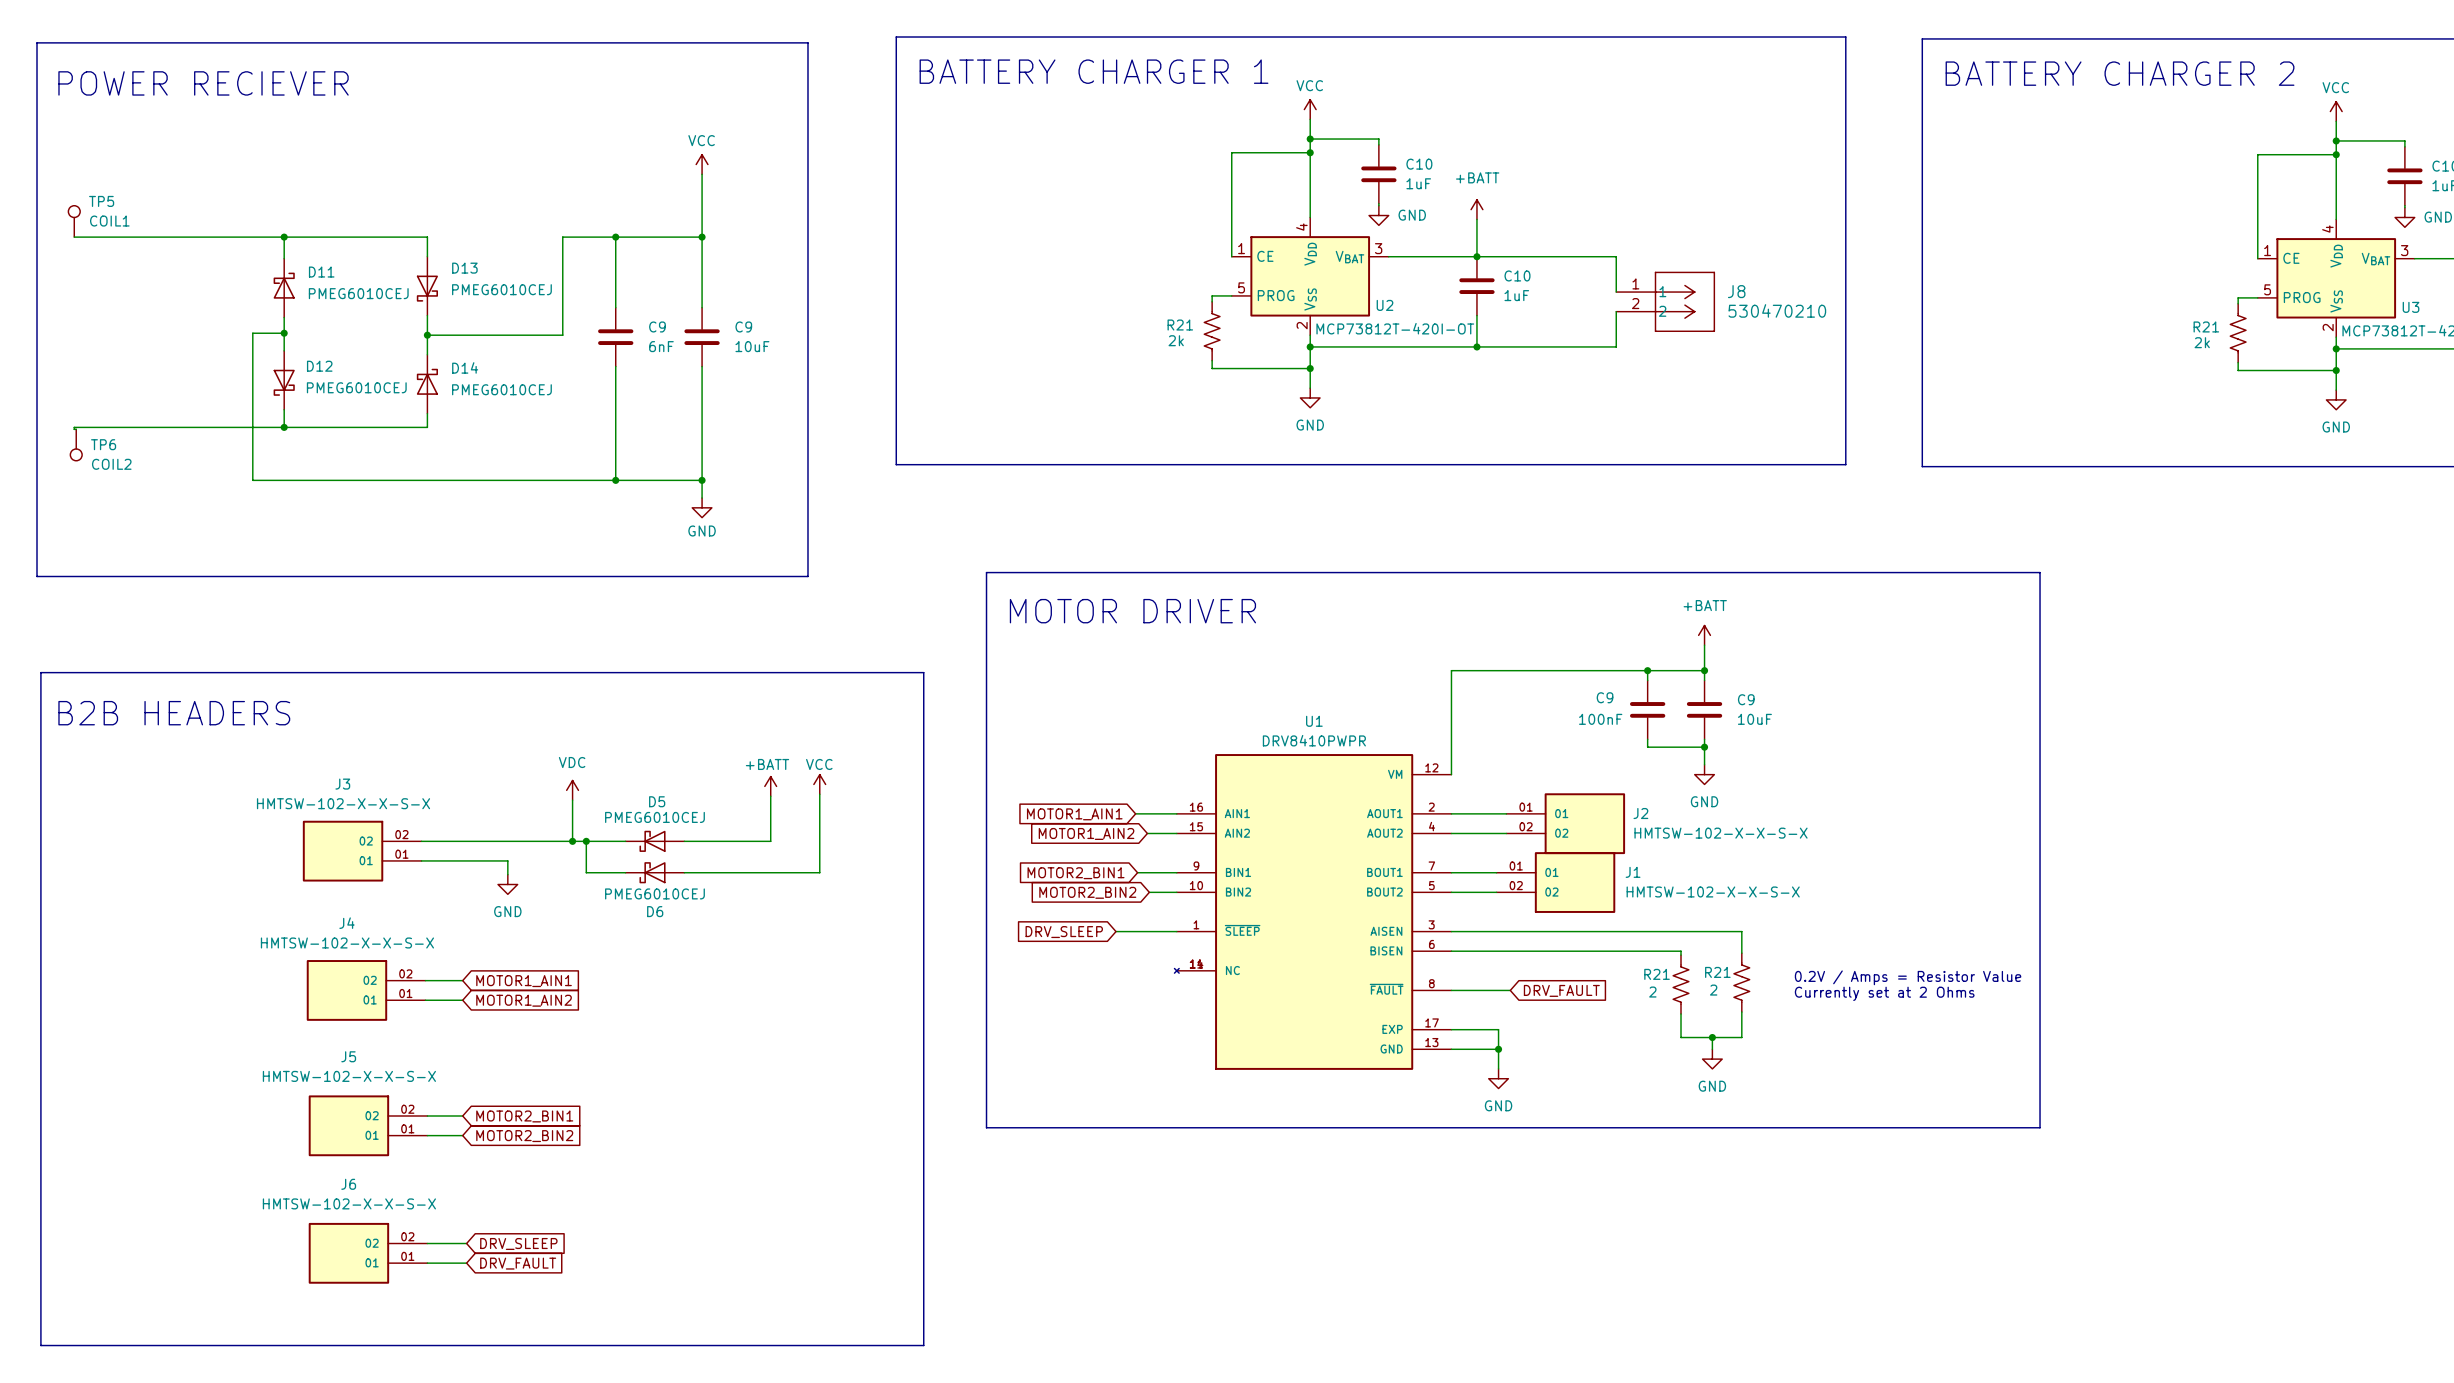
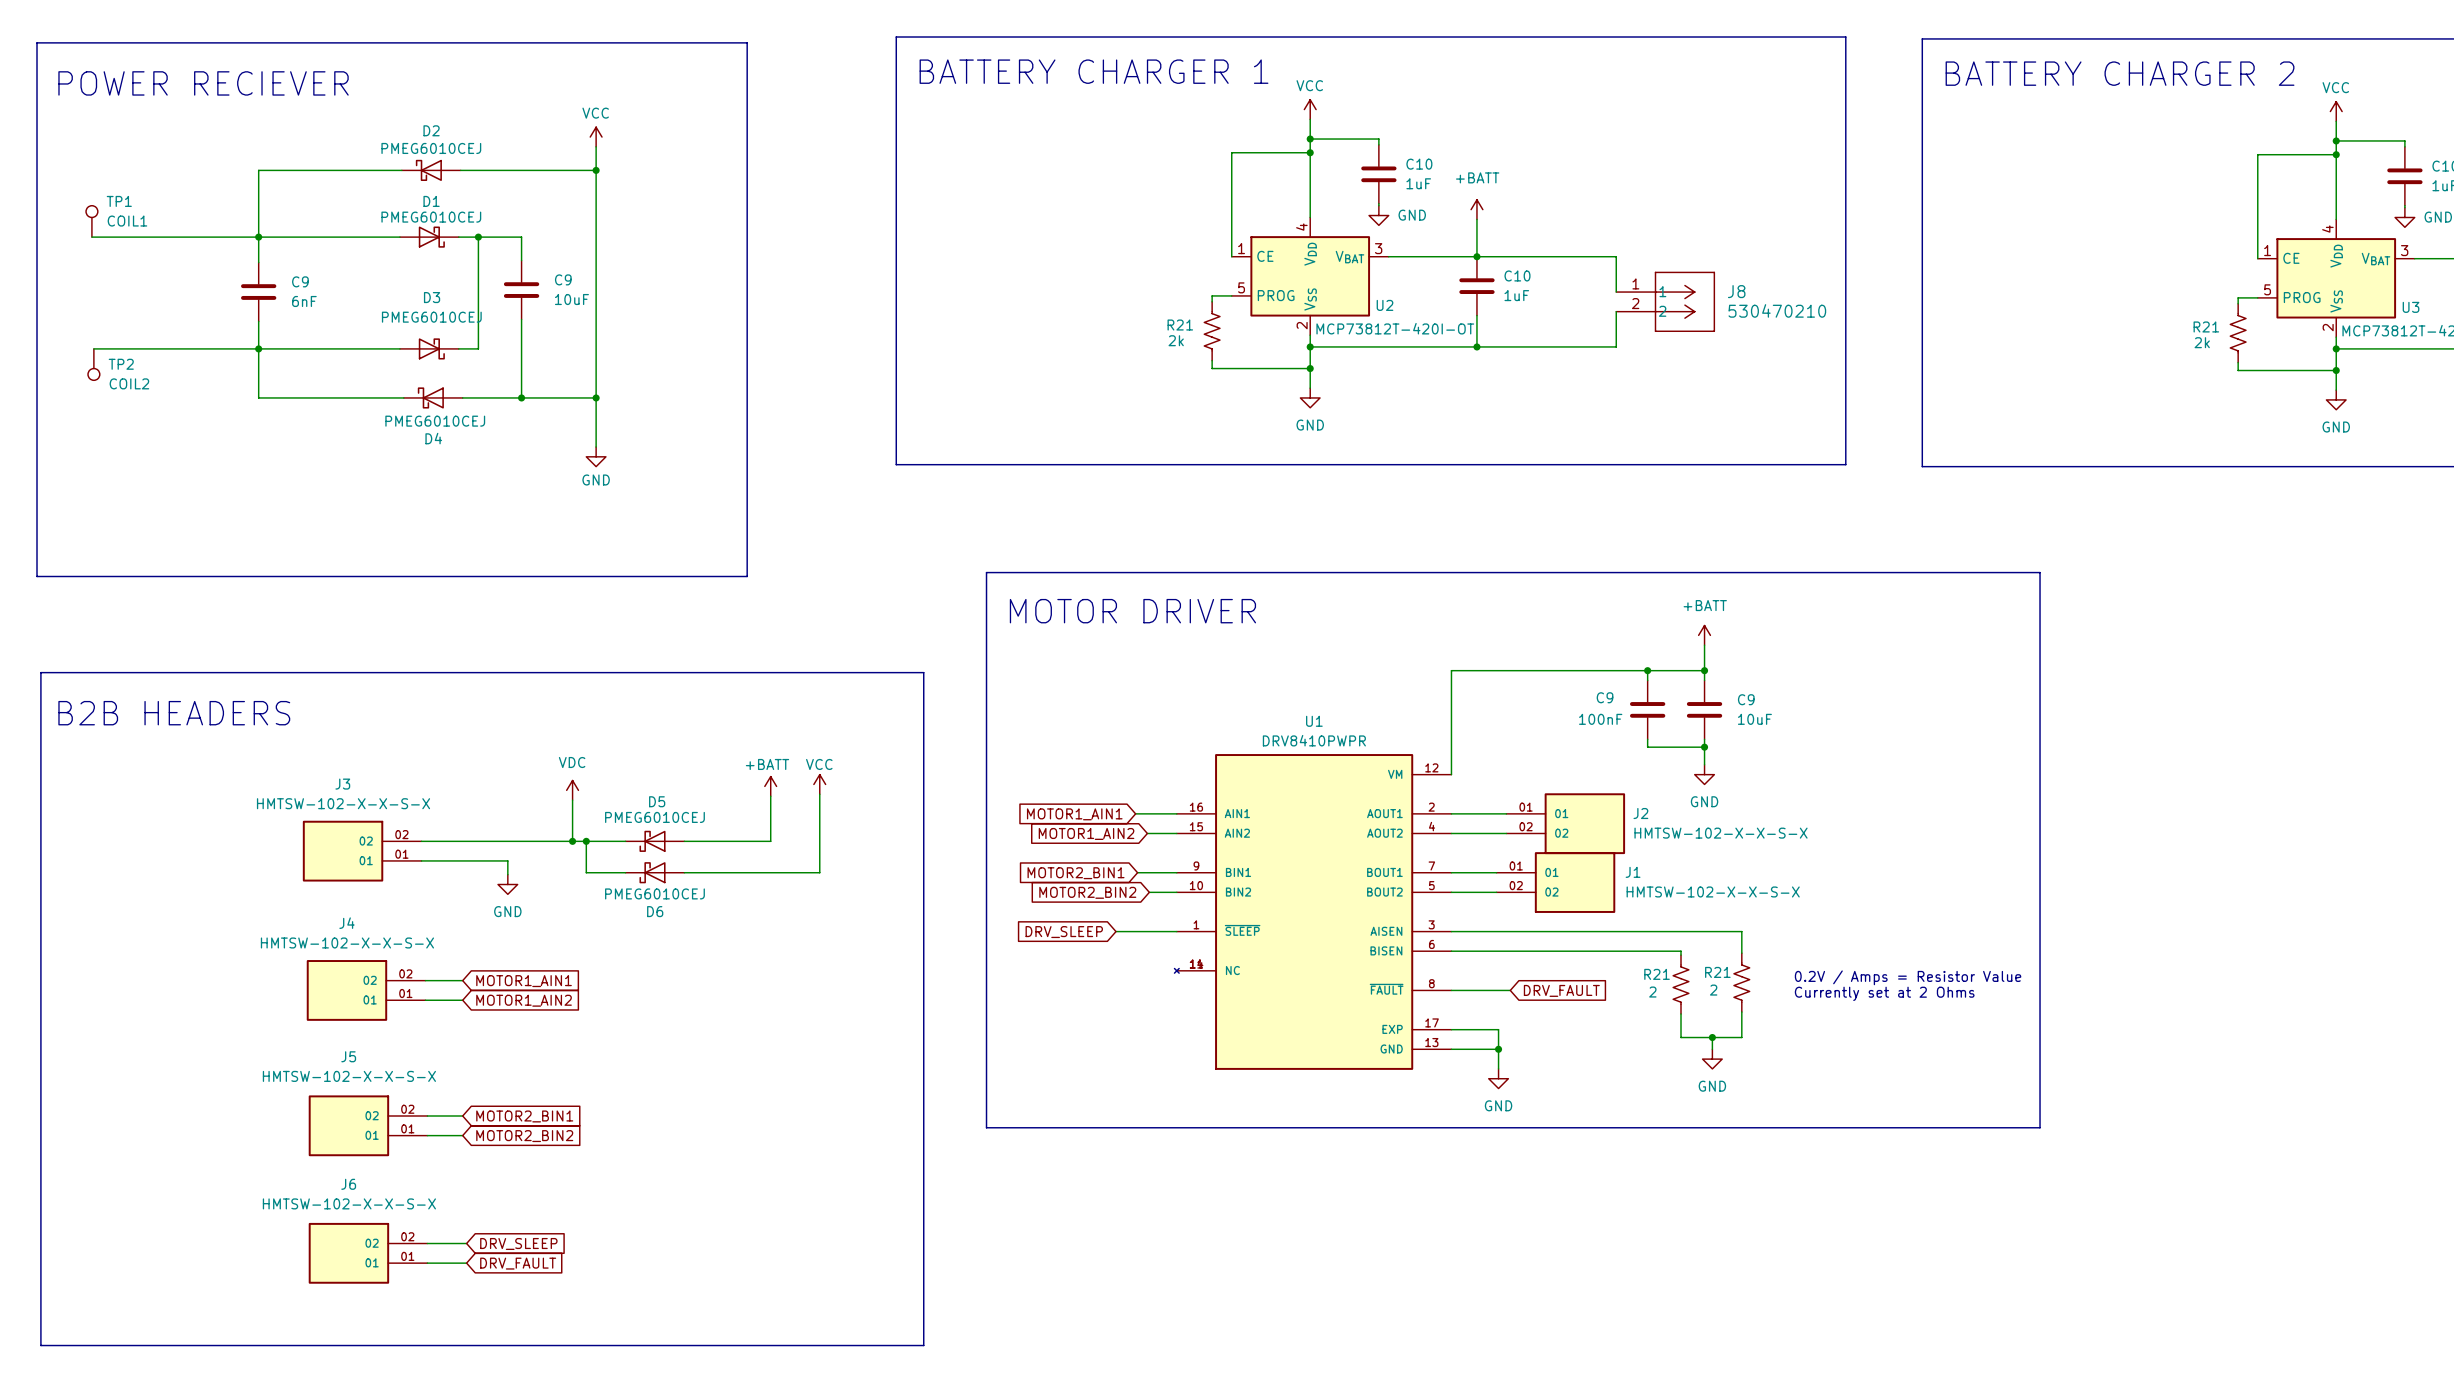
line: (747, 42) (807, 42) (807, 576) (747, 576) -> (747, 42) (747, 576)
wire: none -> (596, 146) (596, 447)
power symbol position: VCC (702, 164) -> VCC (596, 137)
wire: none -> (401, 170) (258, 170) (258, 262)
D2: none -> PMEG6010CEJ (431, 170)
wire: none -> (460, 170) (596, 170)
junction: none -> (596, 170)
wire: (702, 174) (702, 307) -> none
TP5: COIL1 (74, 221) -> none
TP1: none -> COIL1 (91, 221)
wire: (74, 237) (91, 237) -> none
wire: (284, 237) (284, 258) -> none
junction position: (284, 237) -> (258, 237)
wire: (399, 237) (427, 237) (427, 256) -> none
D1: none -> PMEG6010CEJ (429, 237)
wire: none -> (458, 237) (521, 237) (521, 260)
wire: none -> (478, 237) (478, 348) (458, 348)
junction: none -> (478, 237)
wire: (615, 237) (615, 307) -> none
junction: (615, 237) -> none
wire: (702, 237) (562, 237) (562, 335) (427, 335) -> none
junction: (702, 237) -> none
D13: PMEG6010CEJ (427, 286) -> none
D11: PMEG6010CEJ (284, 288) -> none
C9: none -> 6nF (258, 292)
wire: (427, 315) (427, 354) -> none
wire: (284, 317) (284, 350) -> none
wire: none -> (521, 319) (521, 397)
wire: none -> (258, 321) (258, 397) (403, 397)
wire: (284, 333) (252, 333) (252, 480) (702, 480) -> none
junction position: (284, 333) -> (258, 348)
junction: (427, 335) -> none
C9: 6nF (615, 337) -> none
C9 position: (702, 337) -> (521, 290)
wire: none -> (93, 348) (399, 348)
D3: none -> PMEG6010CEJ (429, 348)
TP2: none -> COIL2 (93, 364)
wire: (615, 366) (615, 480) -> none
wire: (702, 366) (702, 498) -> none
D12: PMEG6010CEJ (284, 380) -> none
D14: PMEG6010CEJ (427, 384) -> none
D4: none -> PMEG6010CEJ (433, 397)
wire: none -> (462, 397) (596, 397)
junction: none -> (521, 397)
junction: none -> (596, 397)
wire: (284, 409) (284, 427) -> none
wire: (427, 413) (427, 427) (74, 427) (76, 429) -> none
junction: (284, 427) -> none
TP6: COIL2 (76, 445) -> none
junction: (615, 480) -> none
junction: (702, 480) -> none
power symbol position: GND (702, 507) -> GND (596, 456)

